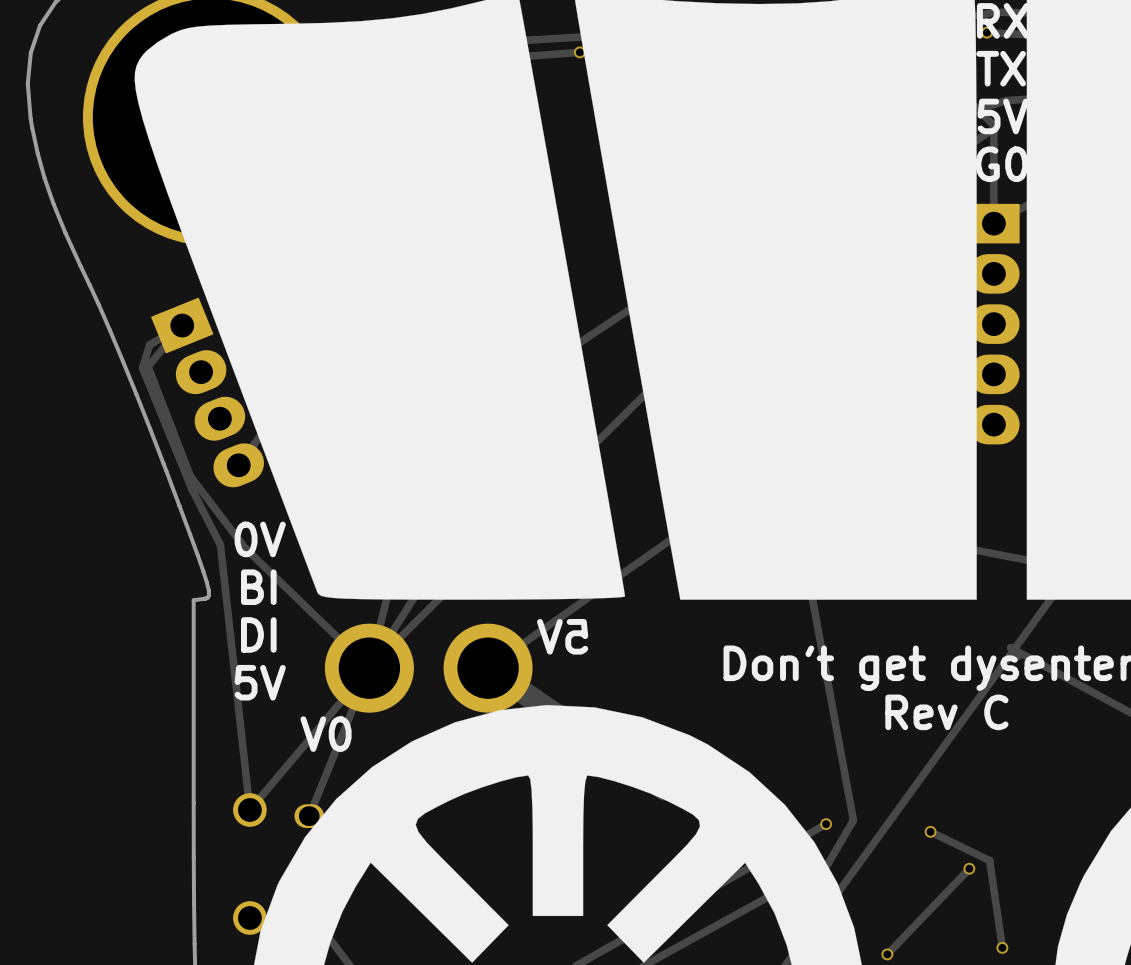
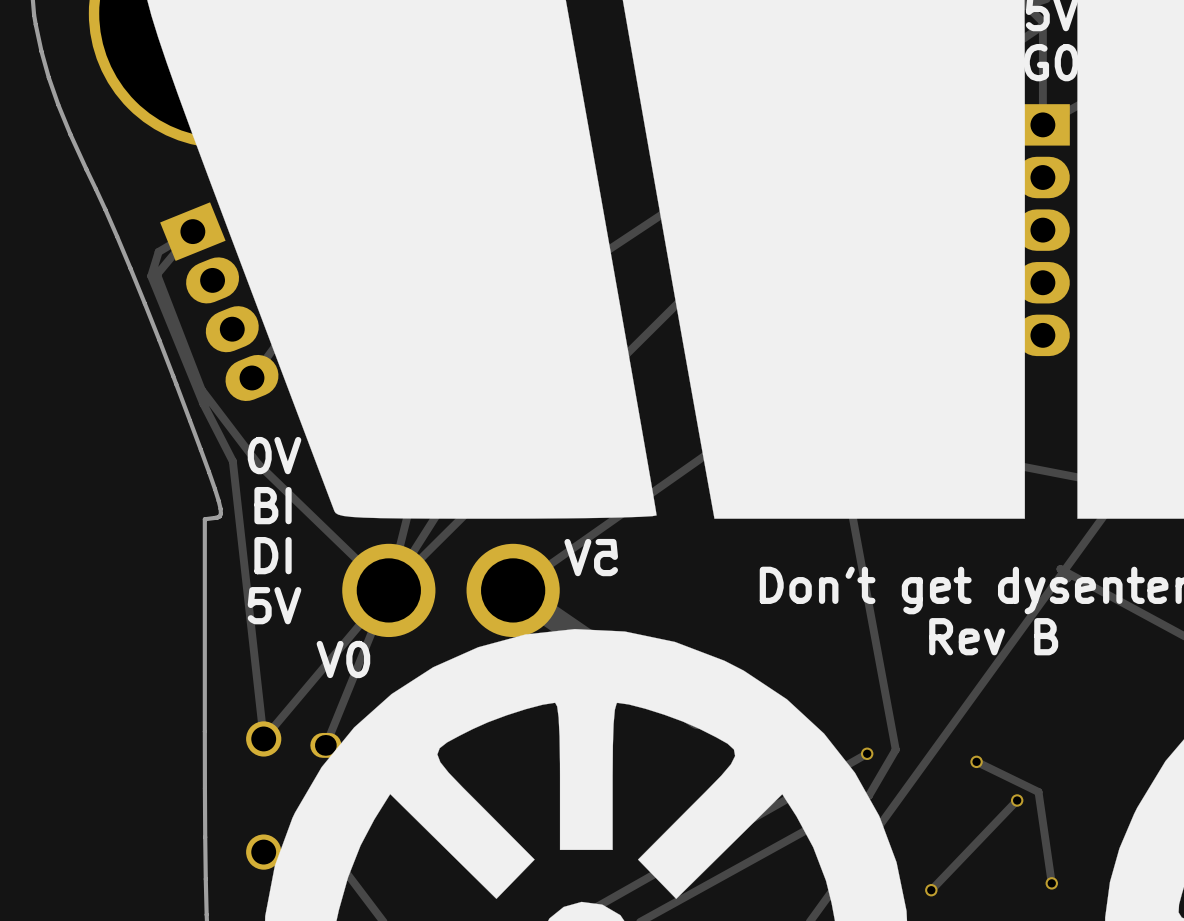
text: Rev C (946, 712) -> Rev B (993, 636)

